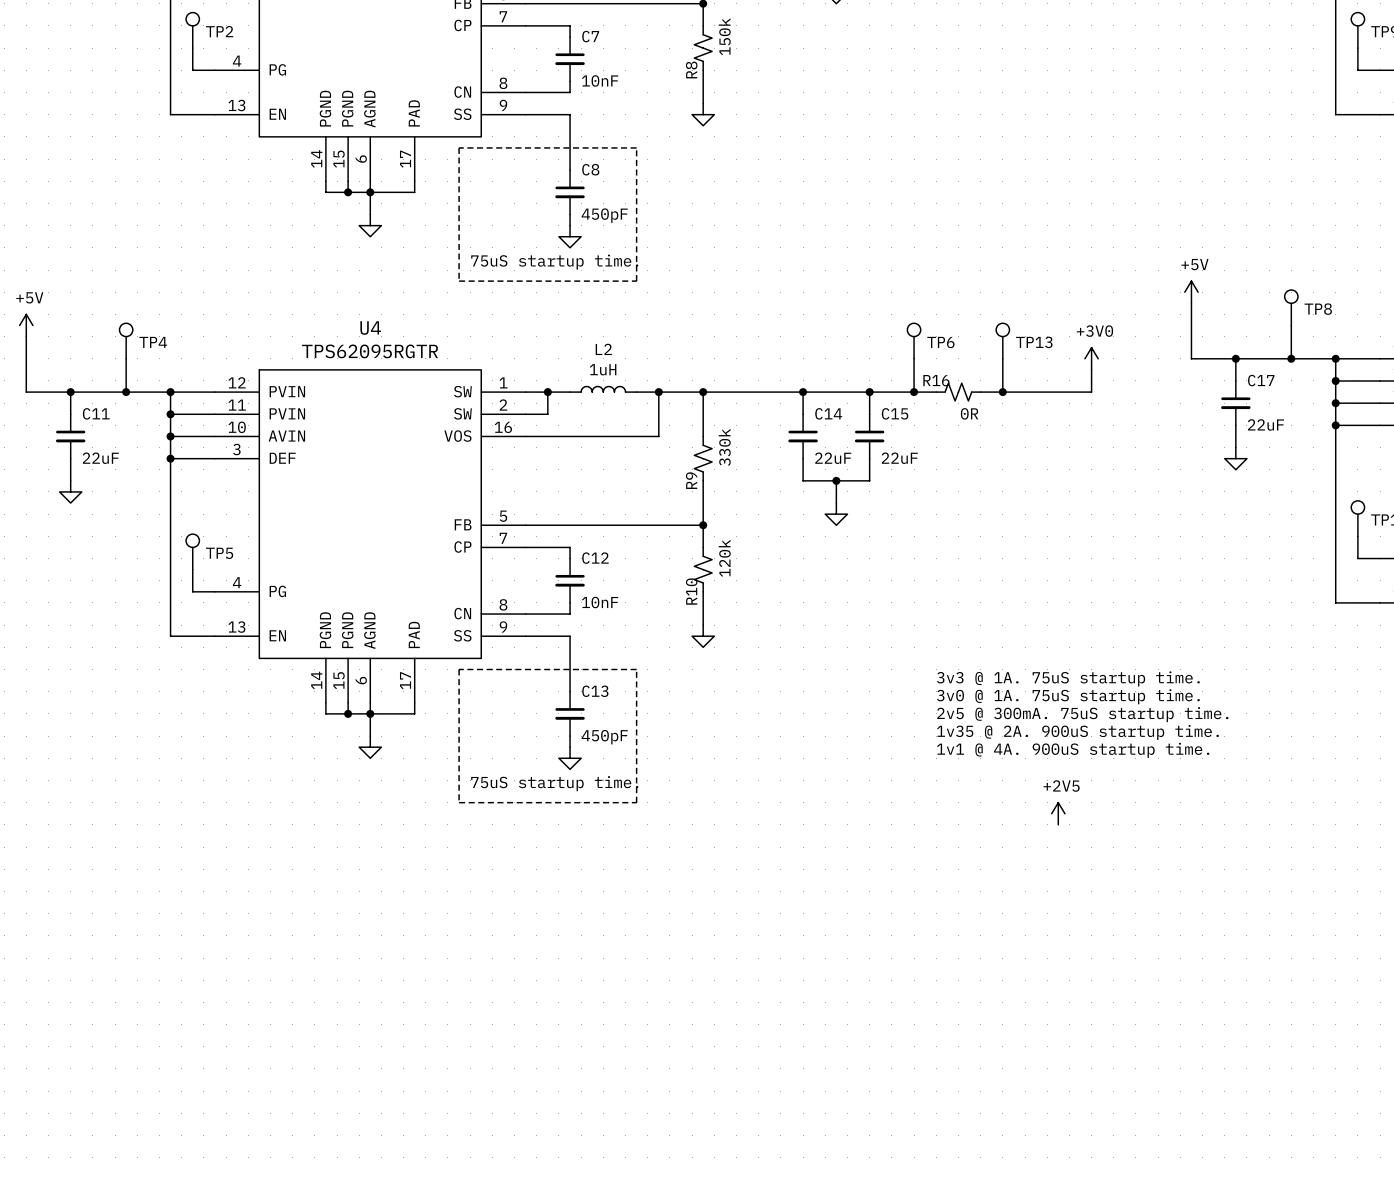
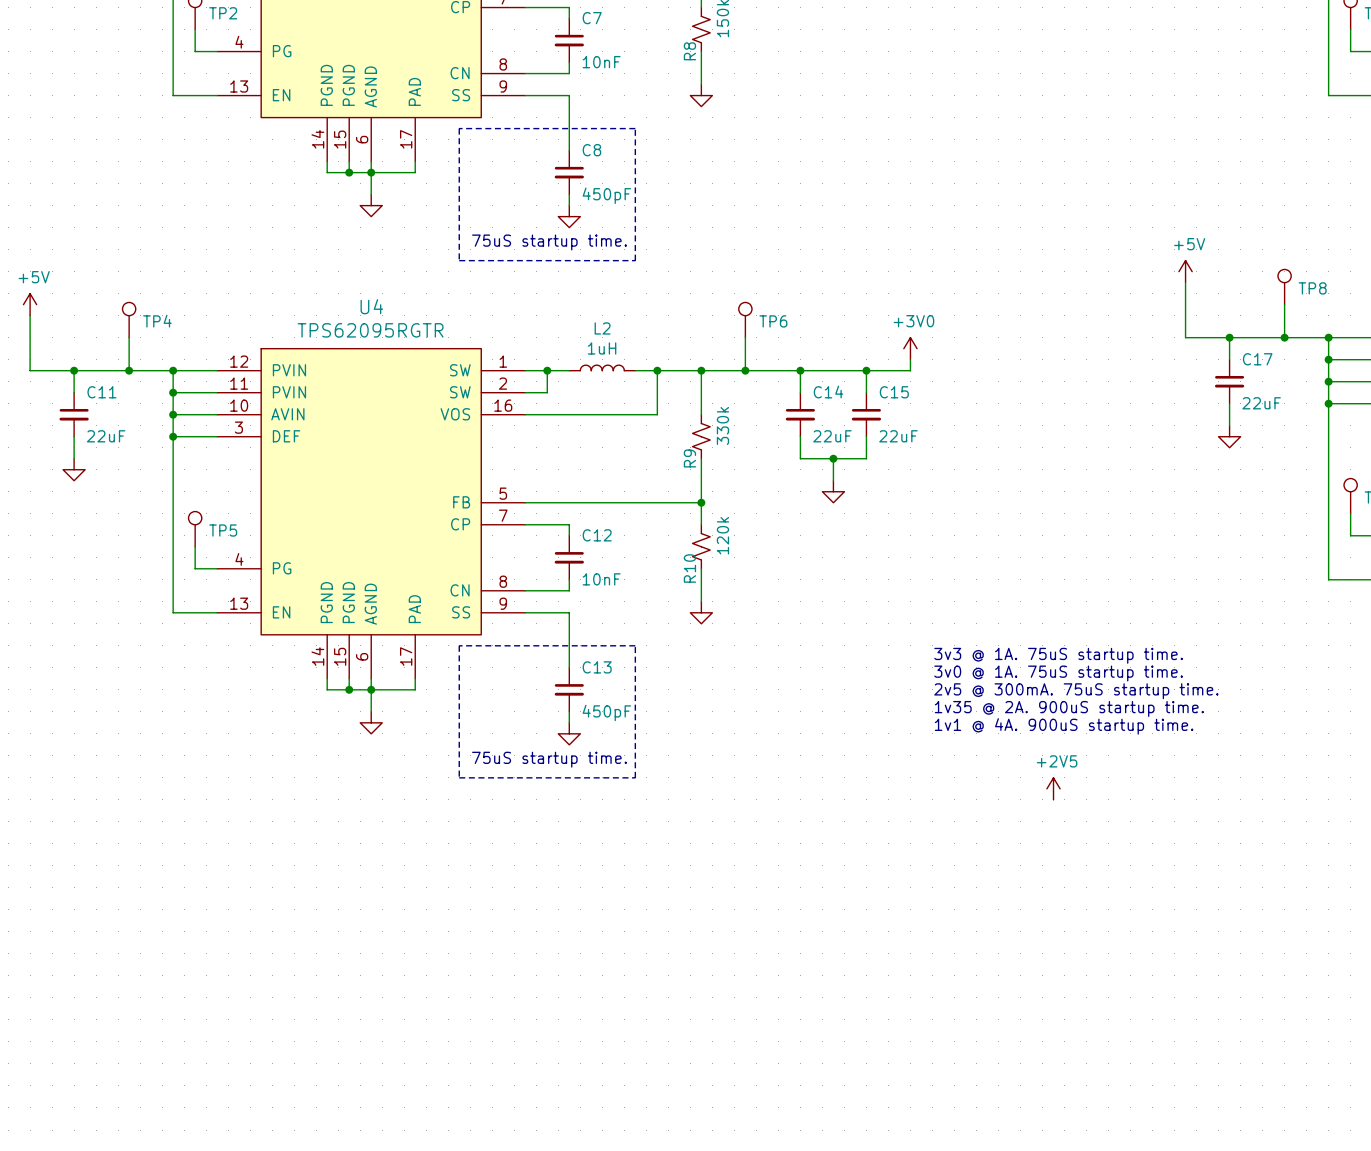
TP6 position: (914, 341) -> (745, 320)
TP13: (1002, 341) -> none
wire: none -> (745, 337) (745, 370)
wire: (1002, 358) (1002, 392) -> none
power symbol position: +3V0 (1091, 358) -> +3V0 (910, 348)
wire: (1091, 369) (1091, 392) (980, 392) -> none
junction: none -> (745, 370)
wire: (914, 392) (936, 392) -> none
junction: (914, 392) -> none
R16: 0R (958, 392) -> none
junction: (1002, 392) -> none

